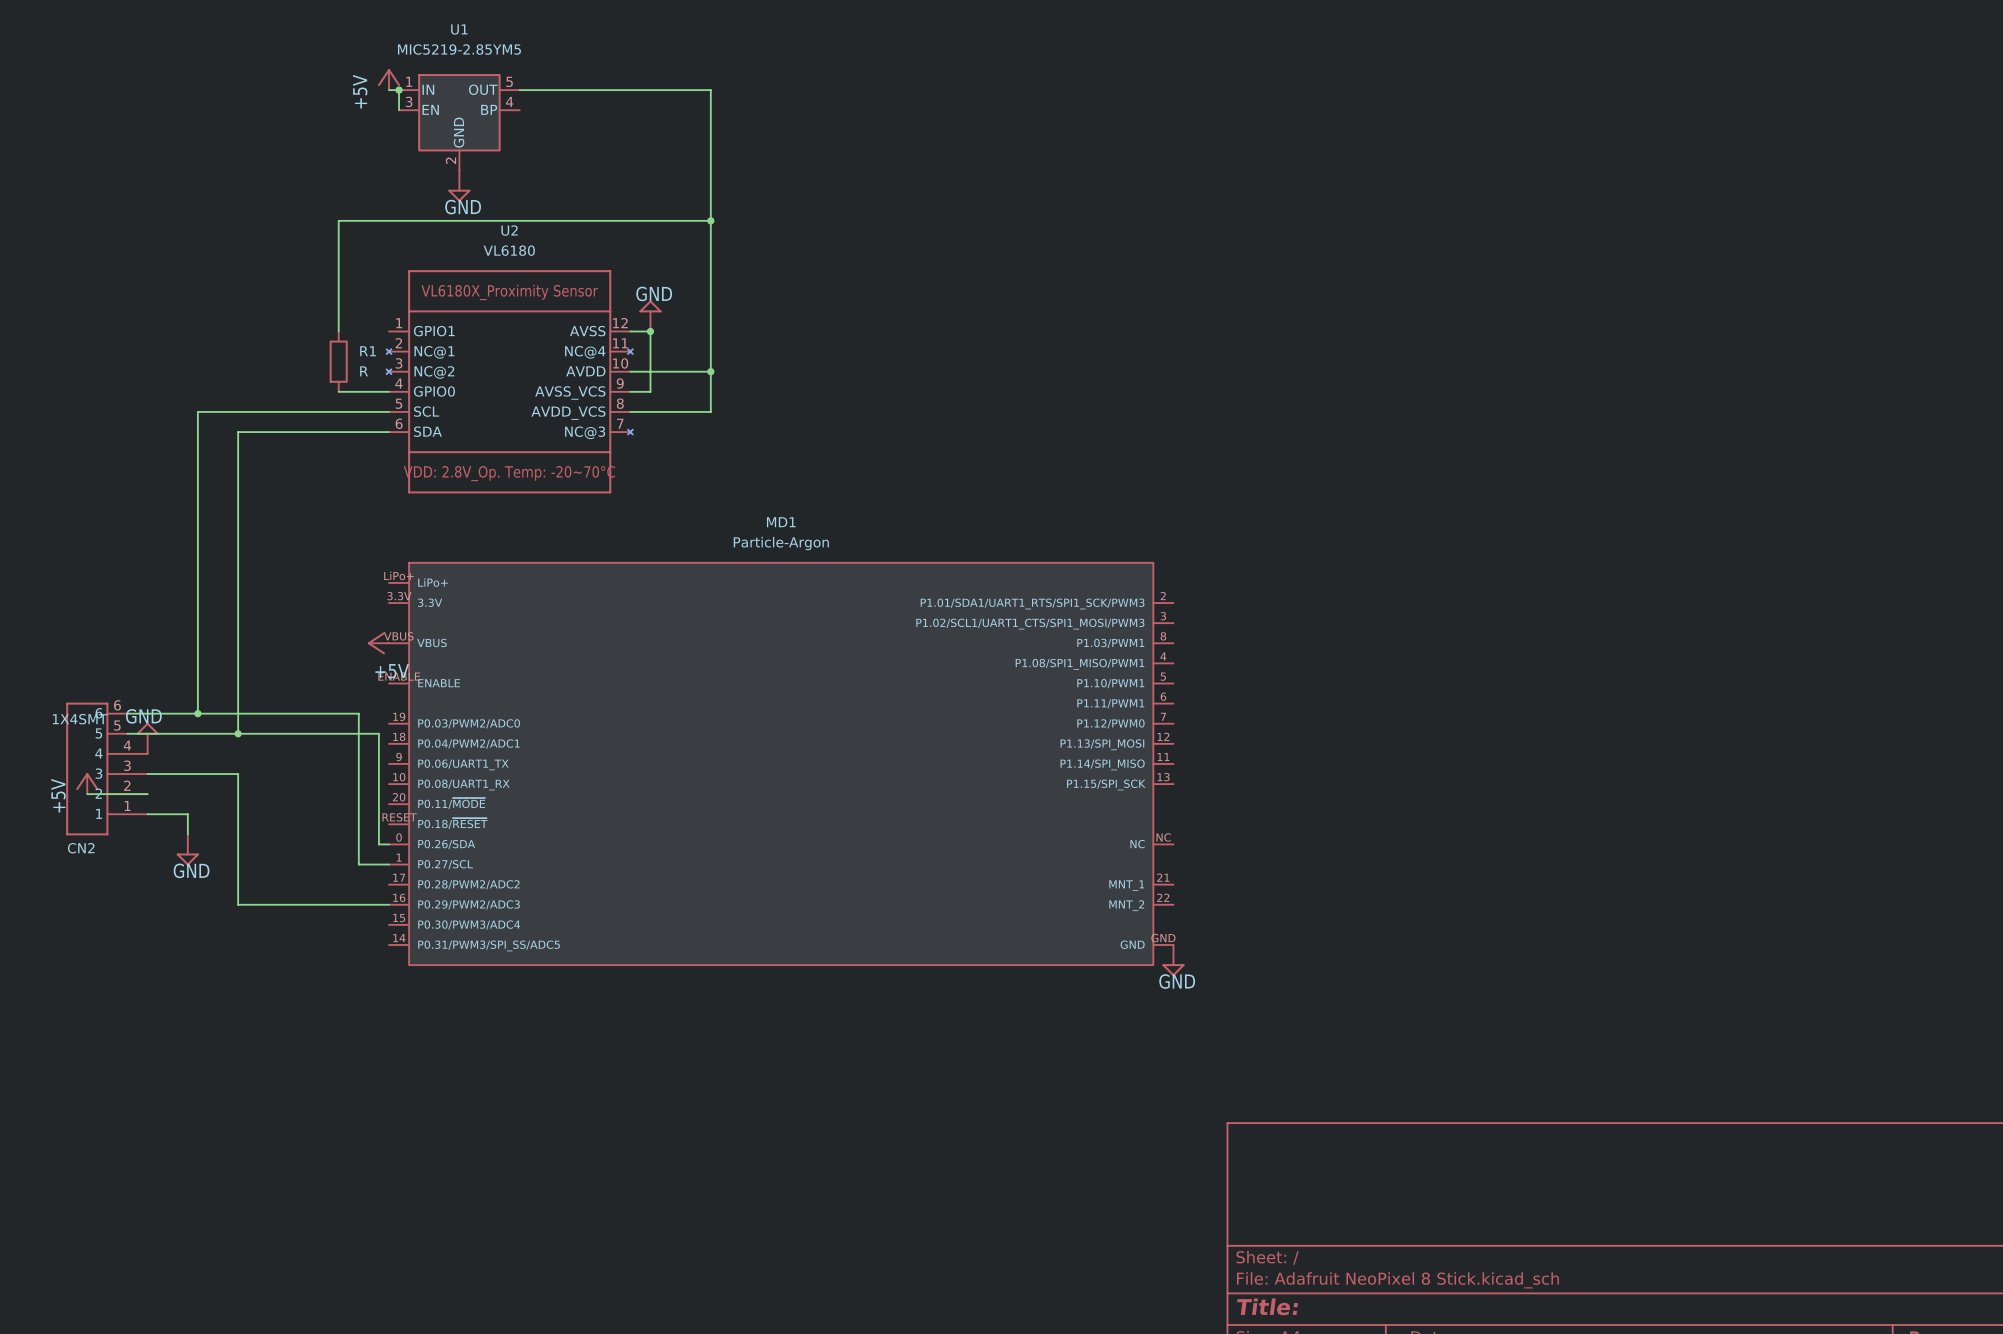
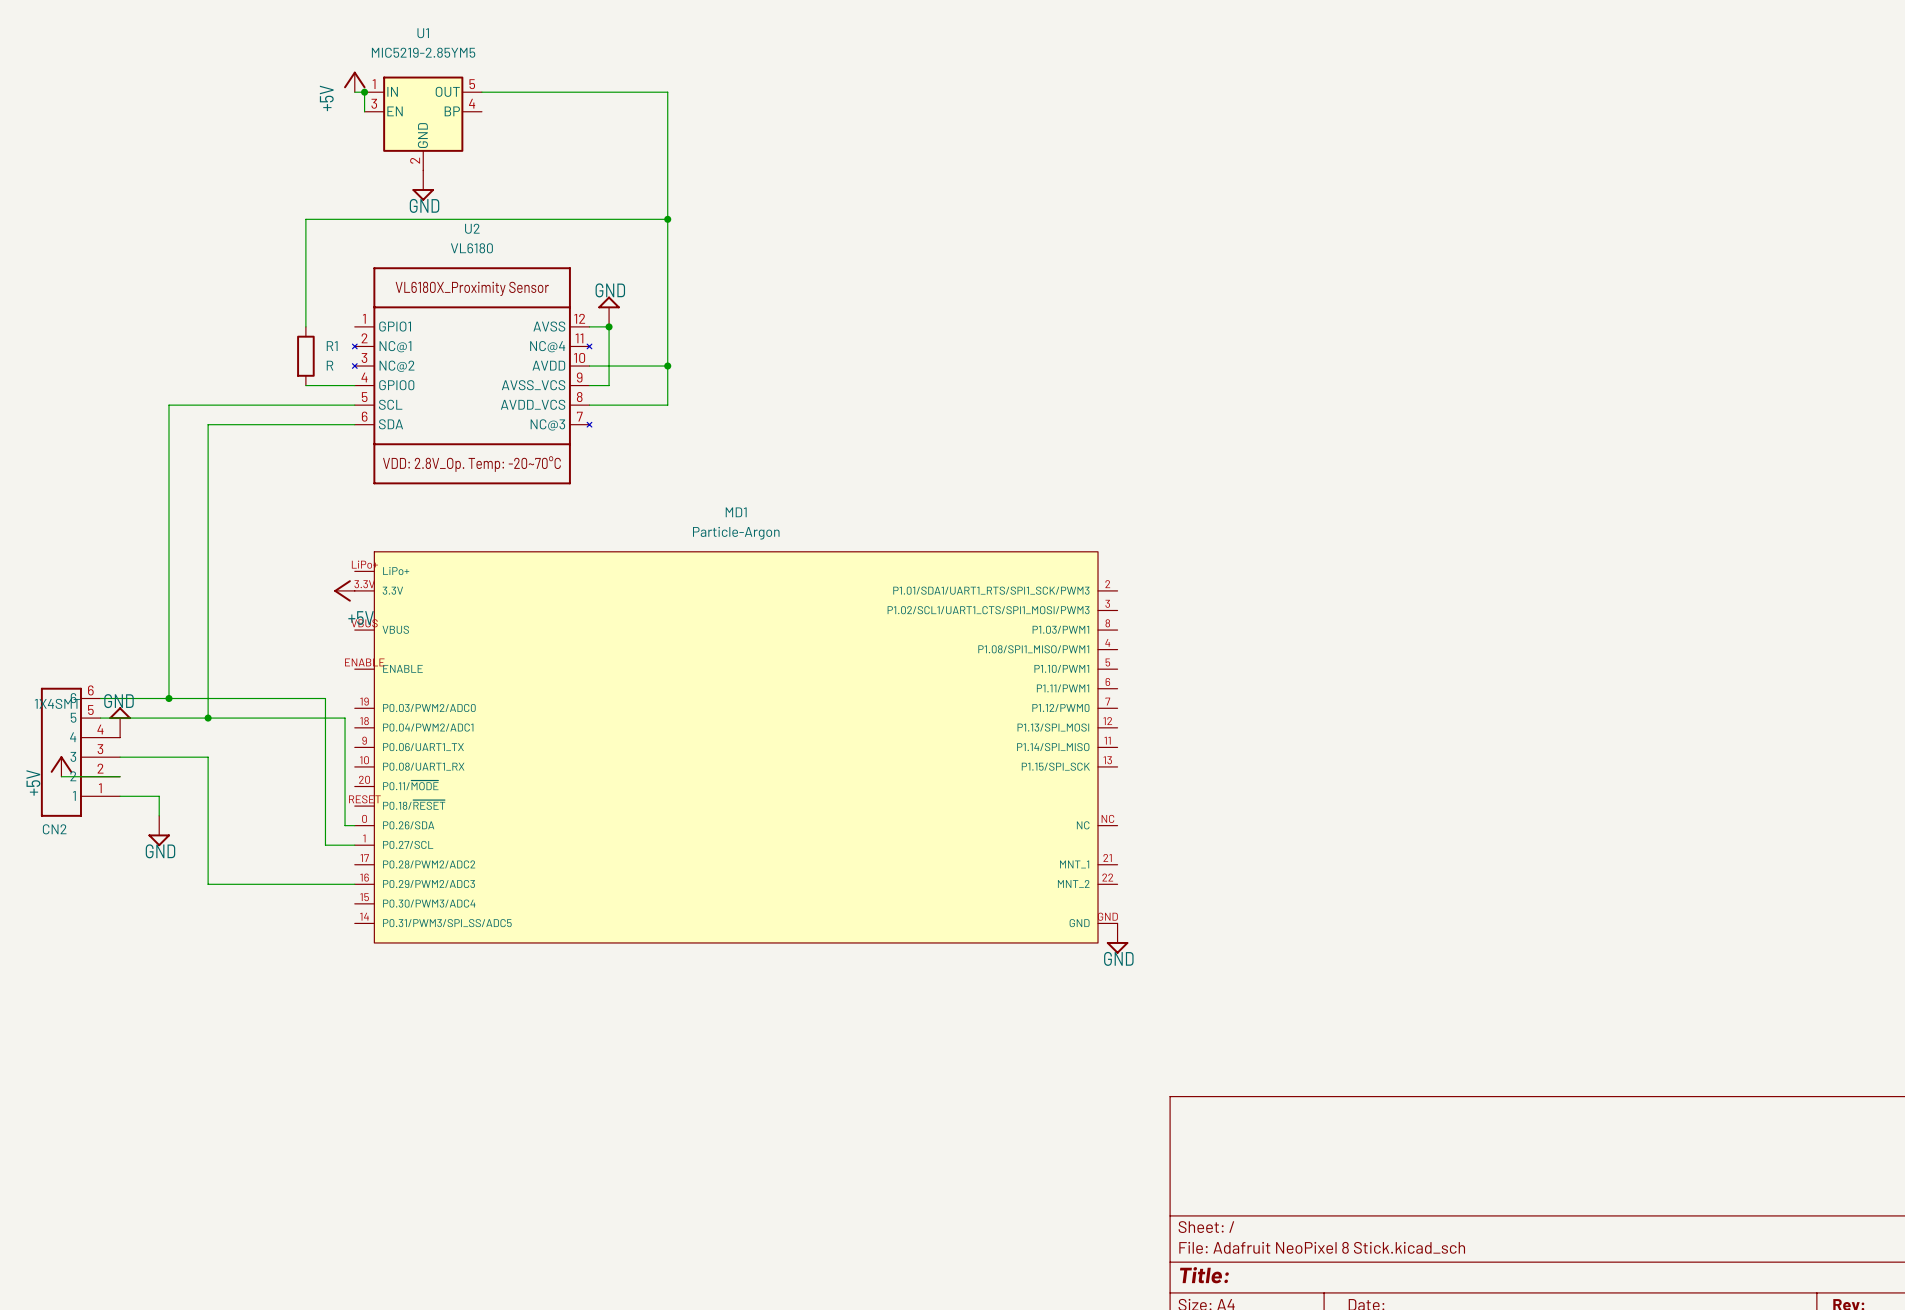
power symbol position: +5V (378, 643) -> +5V (344, 590)

